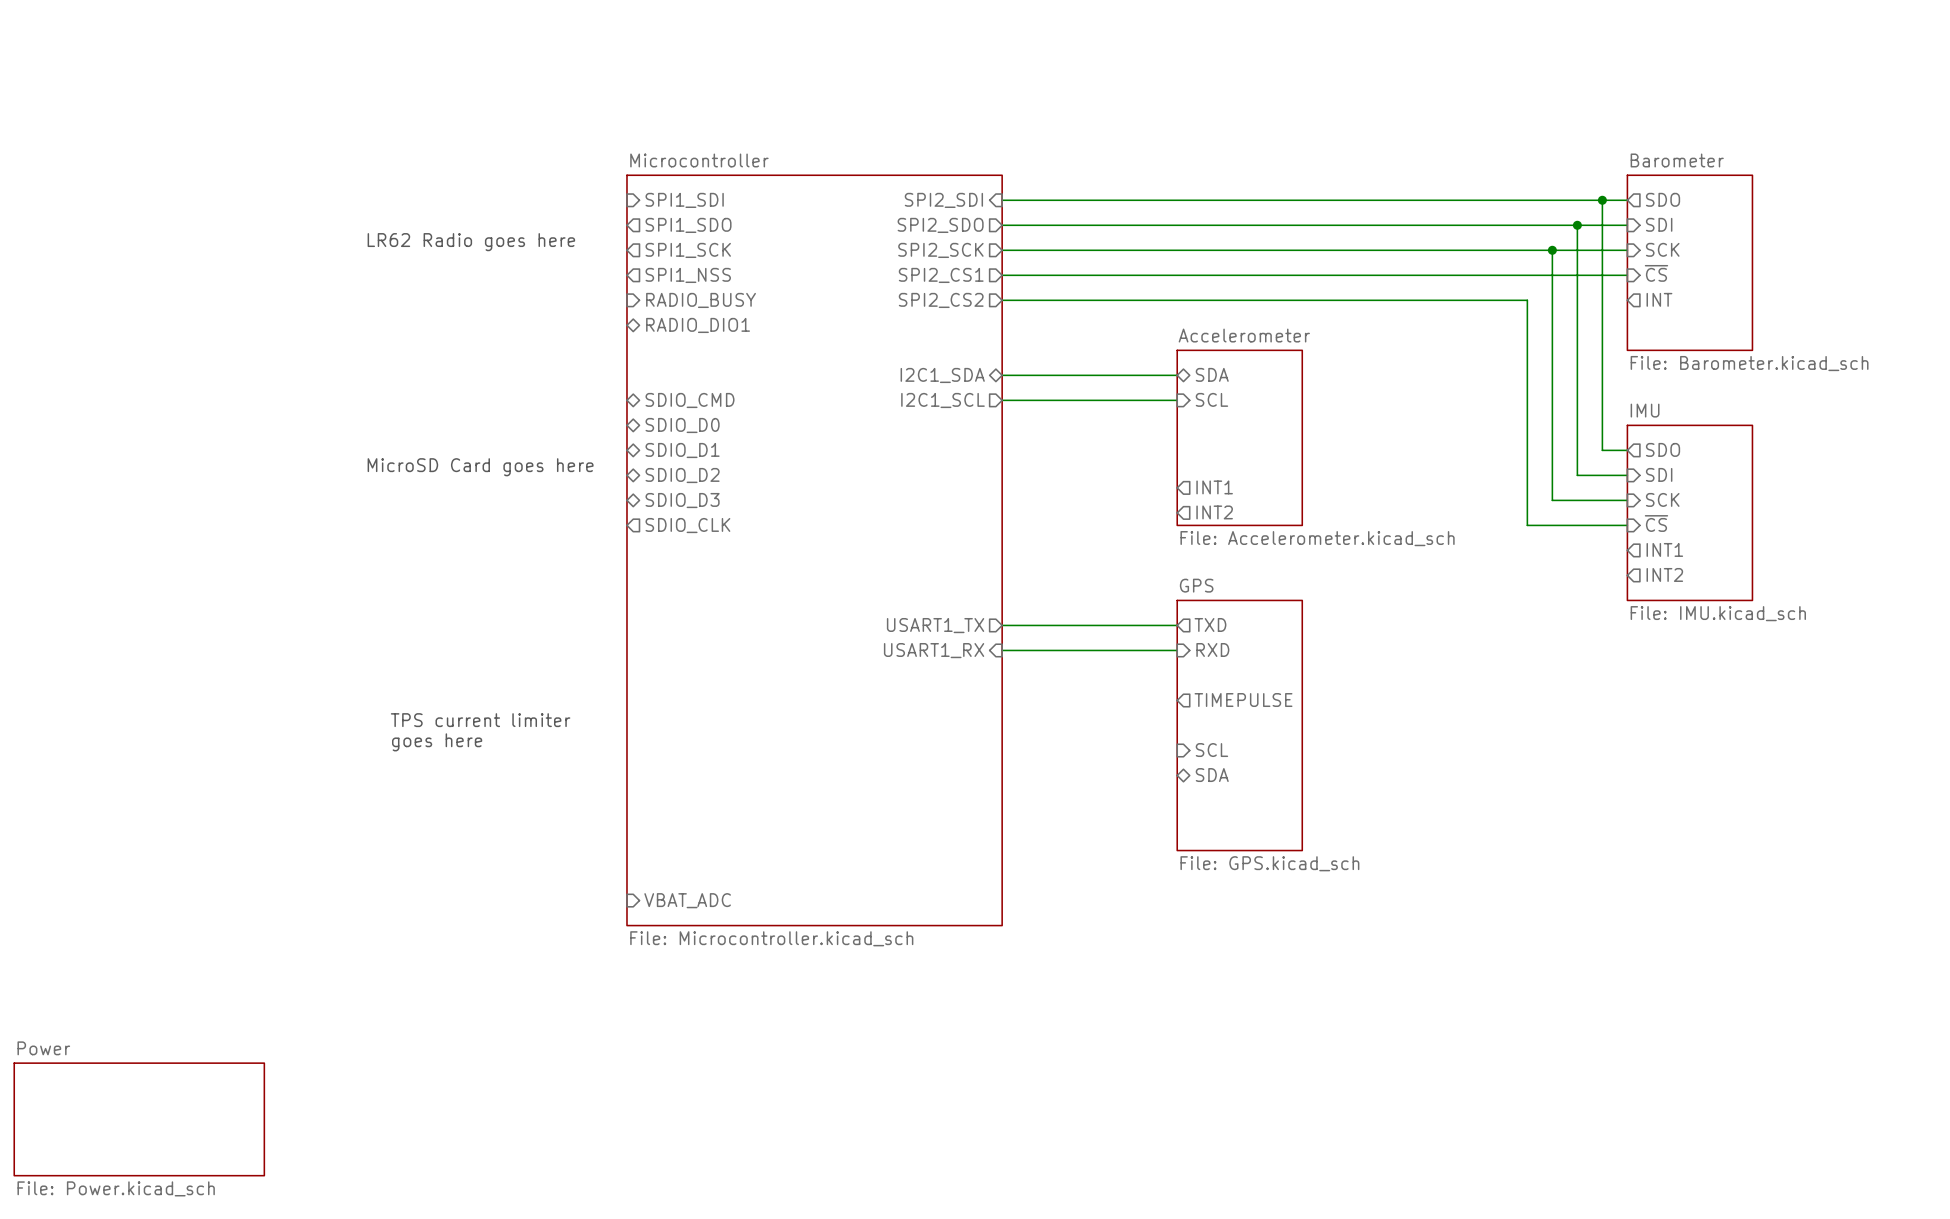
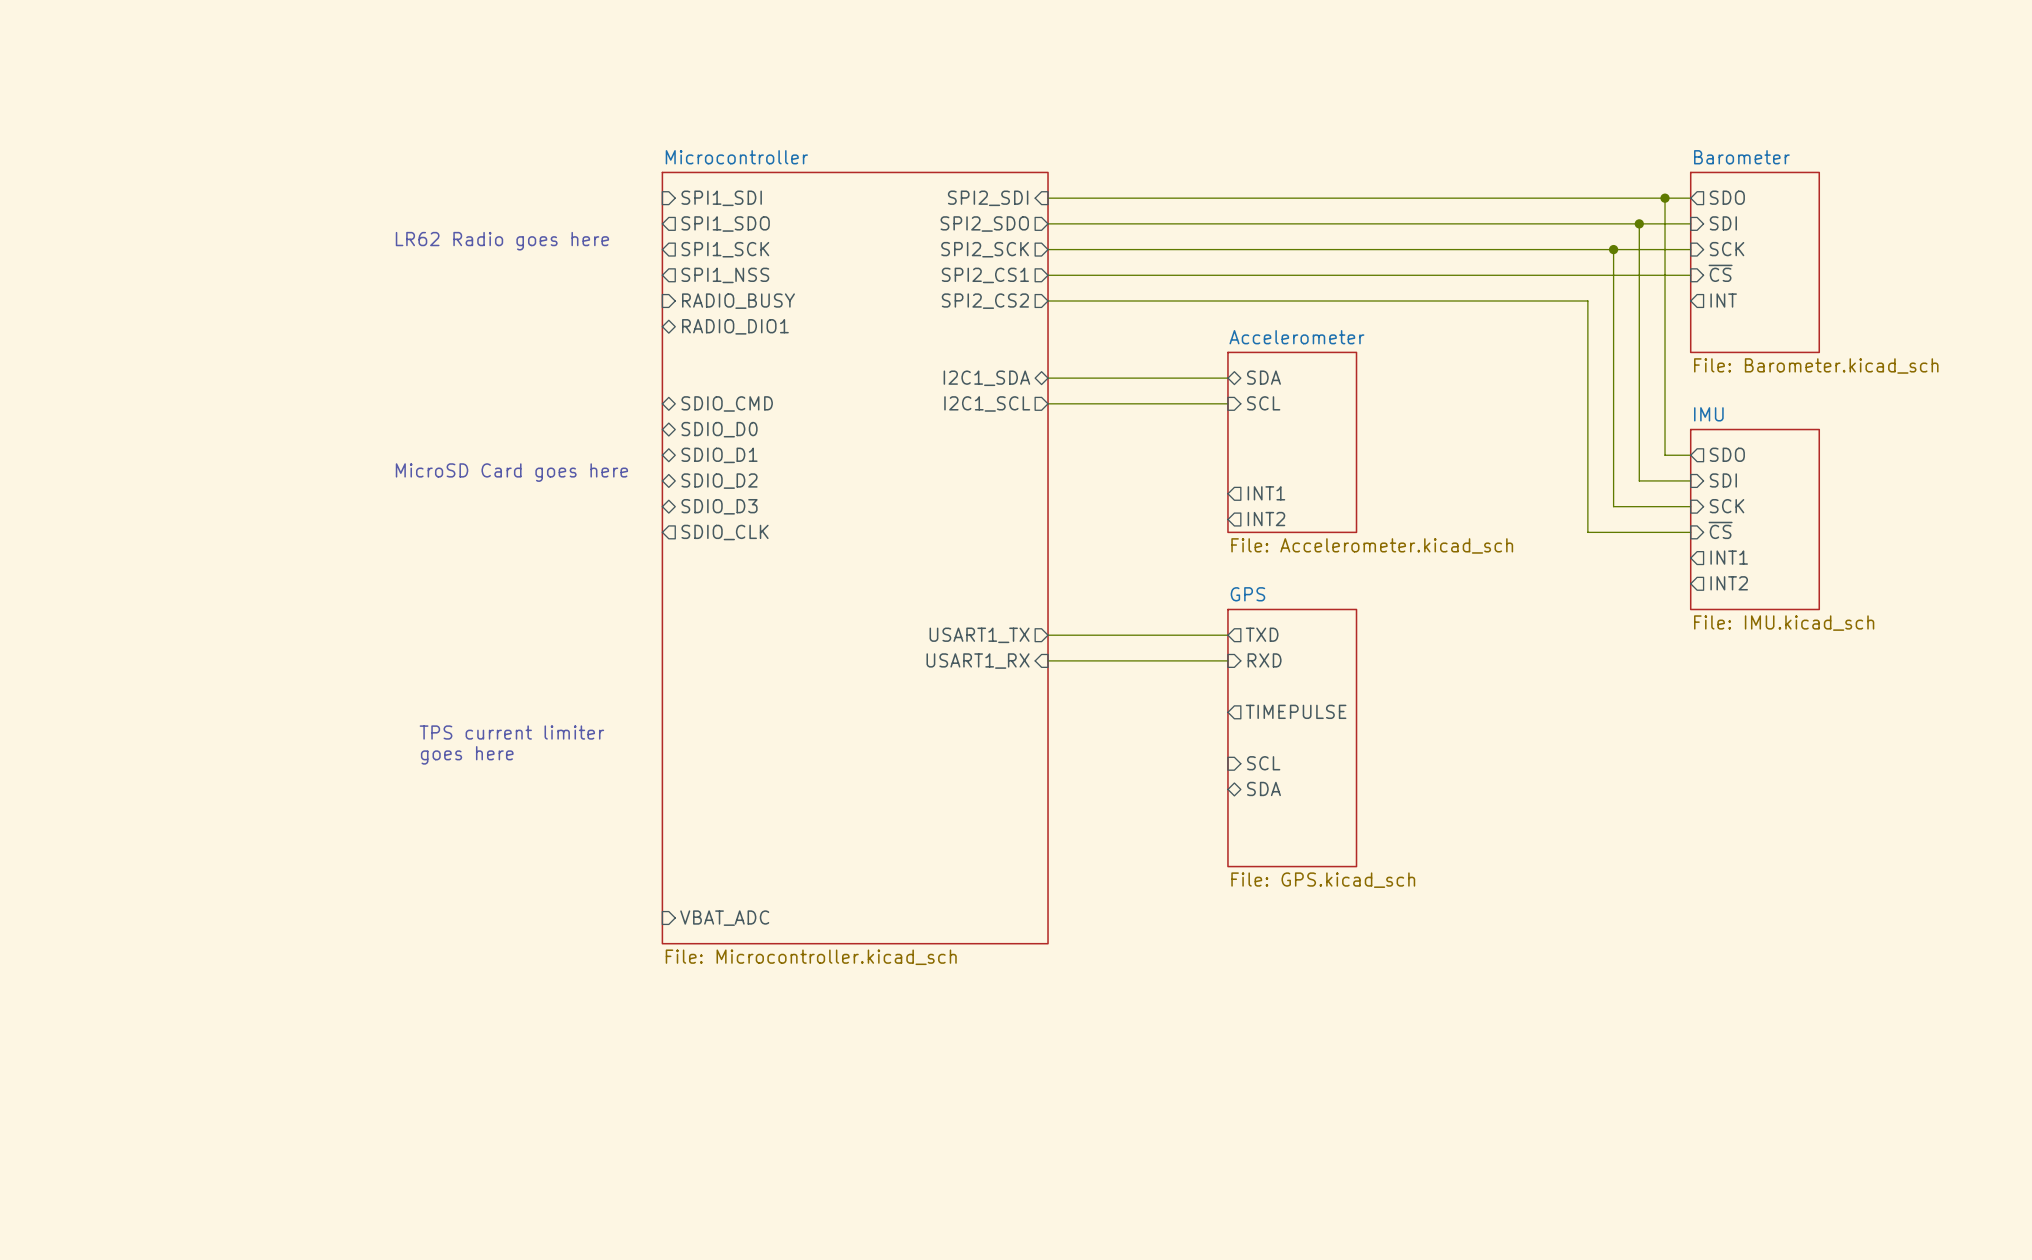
sheet Power: File: Power.kicad_sch (139, 1119) -> none

